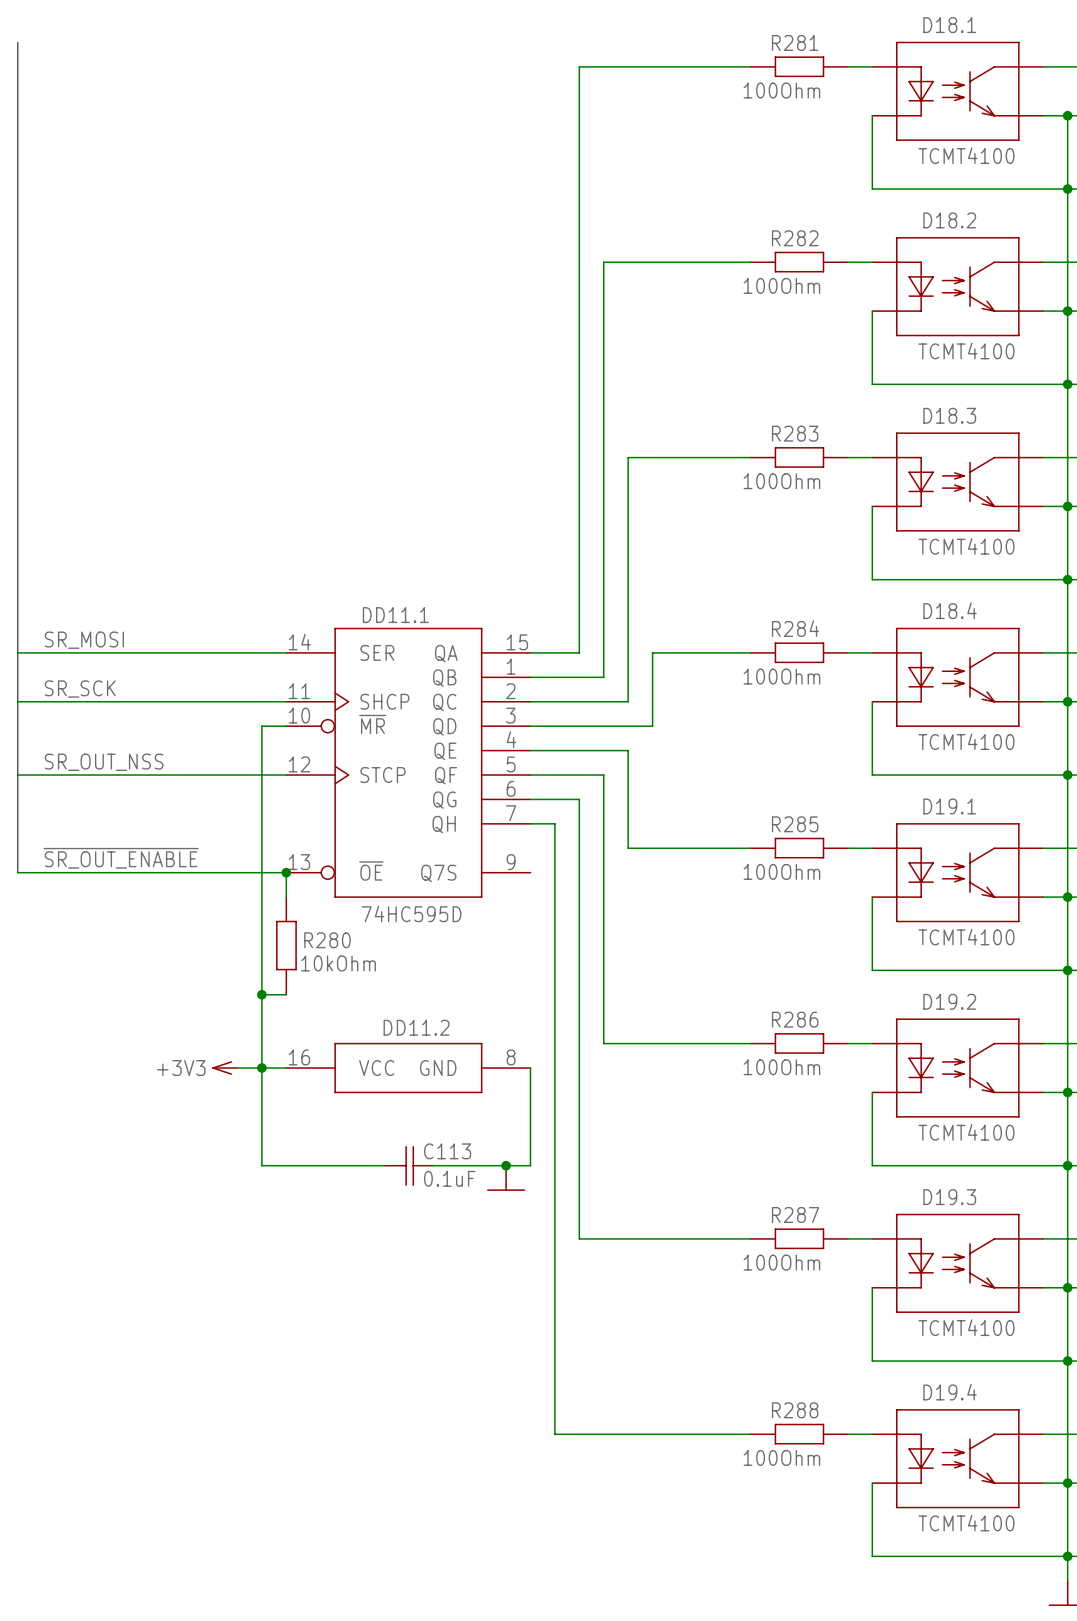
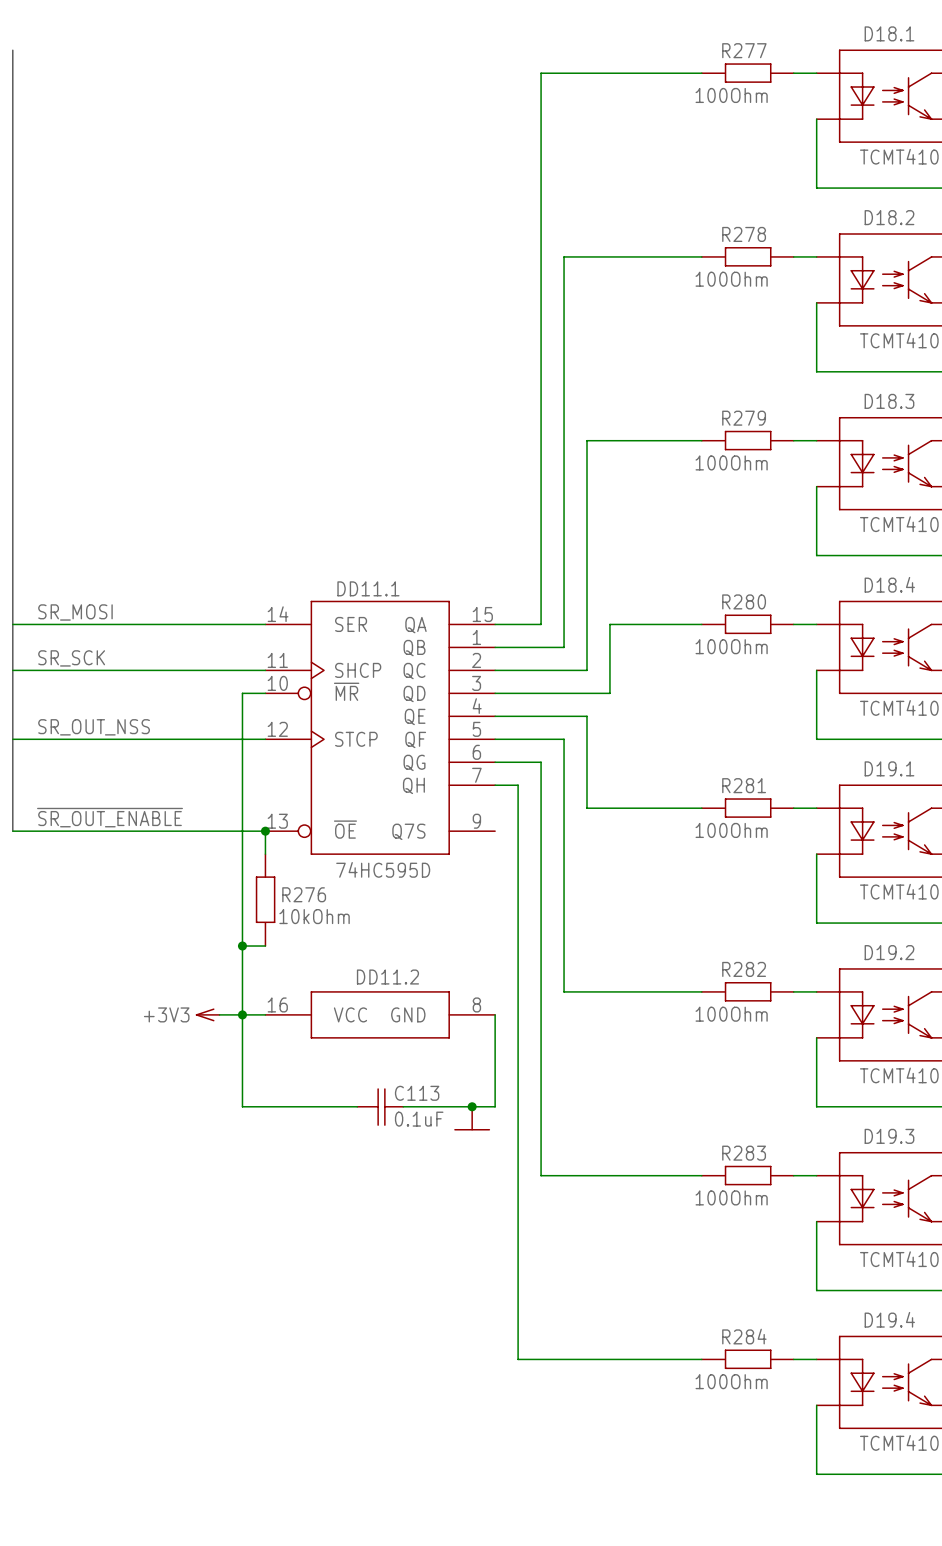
R281 name: R281 (795, 42) -> R277 (744, 50)
R282 name: R282 (795, 238) -> R278 (744, 234)
R283 name: R283 (795, 433) -> R279 (744, 418)
R284 name: R284 (795, 628) -> R280 (744, 601)
R285 name: R285 (795, 824) -> R281 (744, 785)
R280 name: R280 (327, 940) -> R276 (304, 894)
R286 name: R286 (795, 1019) -> R282 (744, 969)
R287 name: R287 (795, 1214) -> R283 (744, 1153)
R288 name: R288 (795, 1410) -> R284 (744, 1336)

